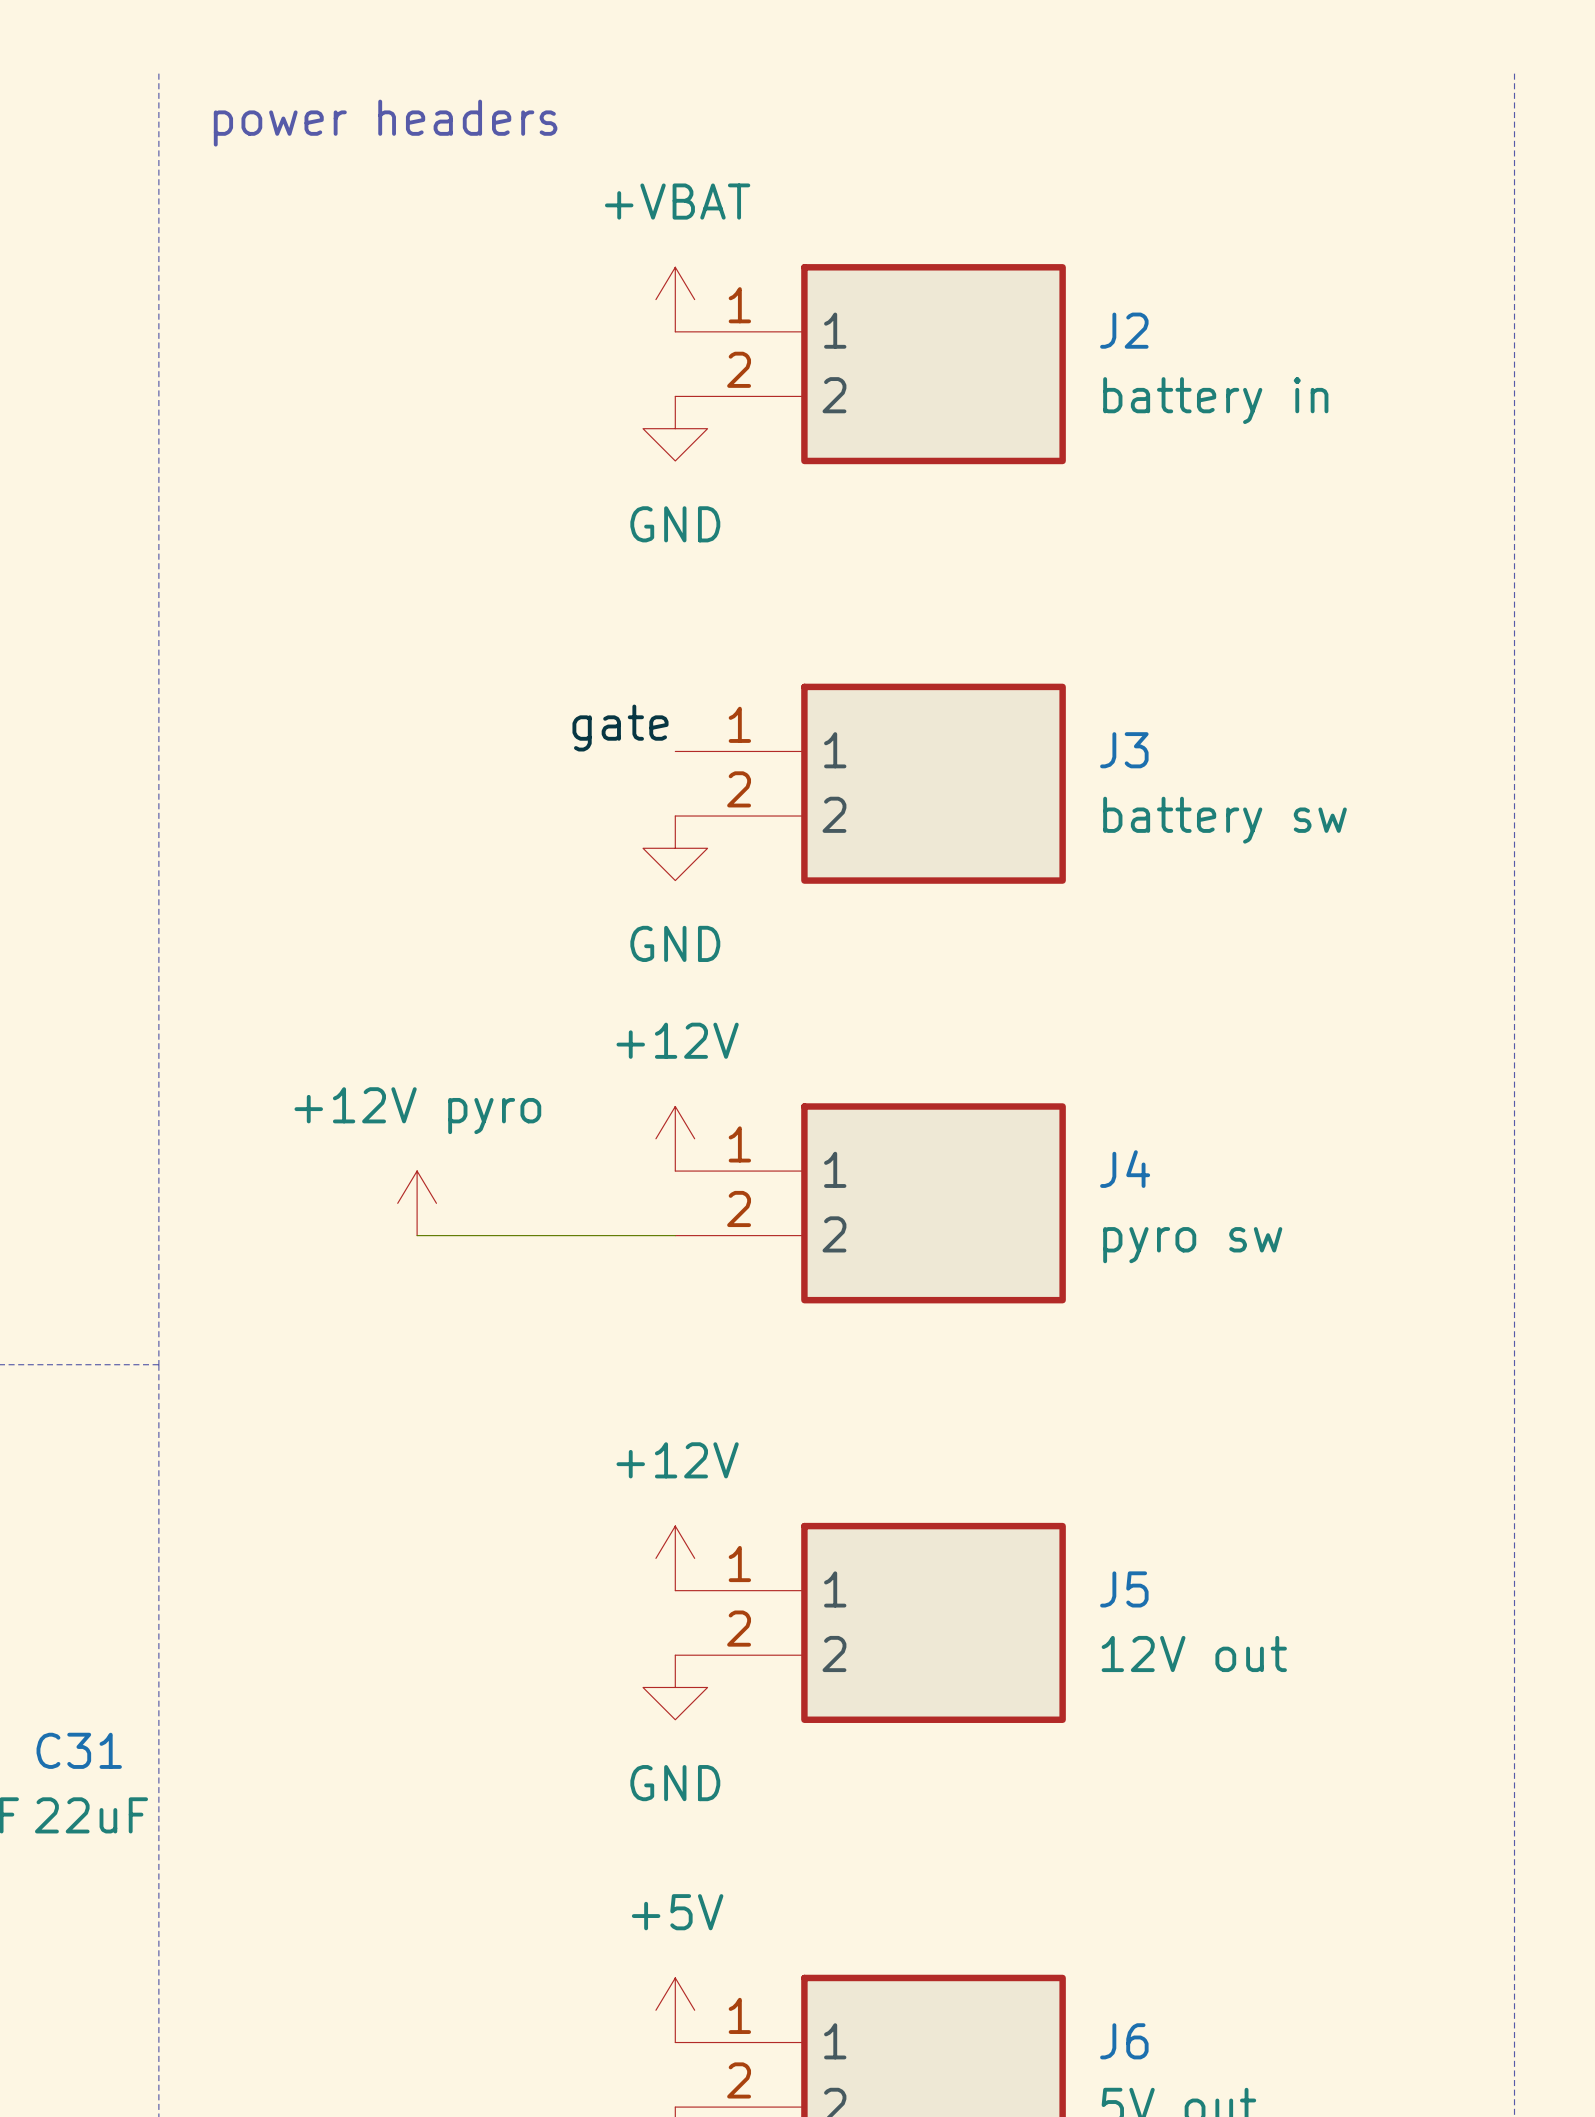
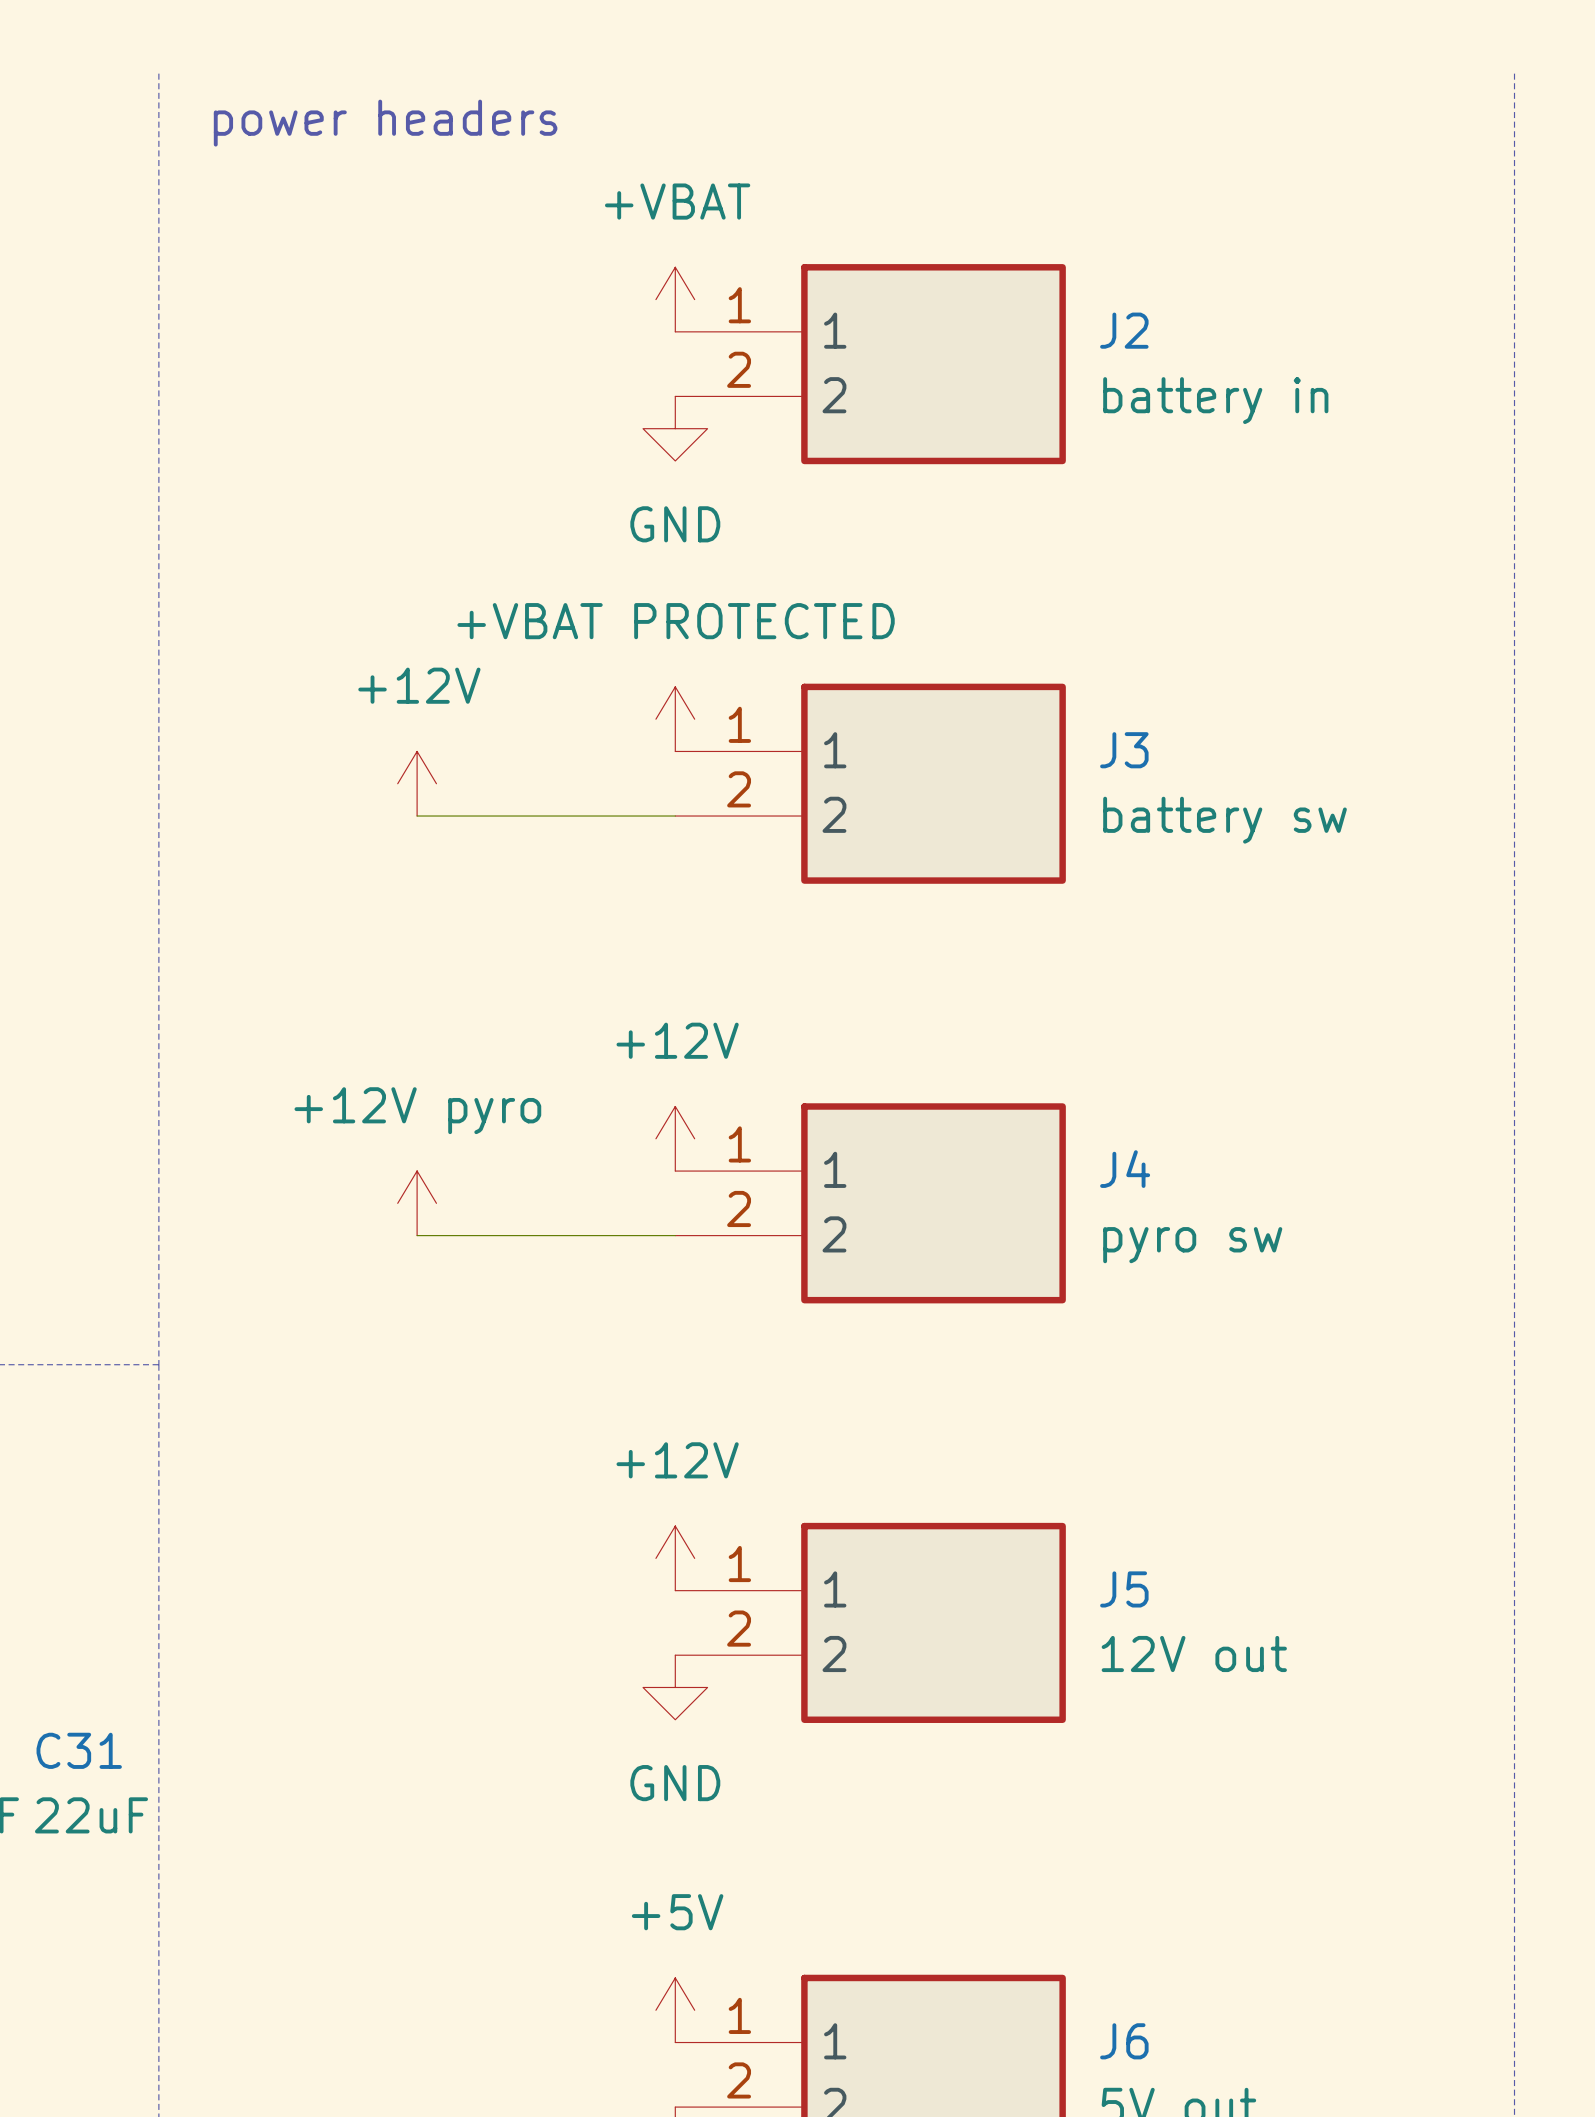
power symbol: none -> +VBAT PROTECTED (675, 719)
label: gate (620, 728) -> none
power symbol: none -> +12V (417, 783)
wire: none -> (417, 816) (675, 816)
power symbol: GND (675, 848) -> none

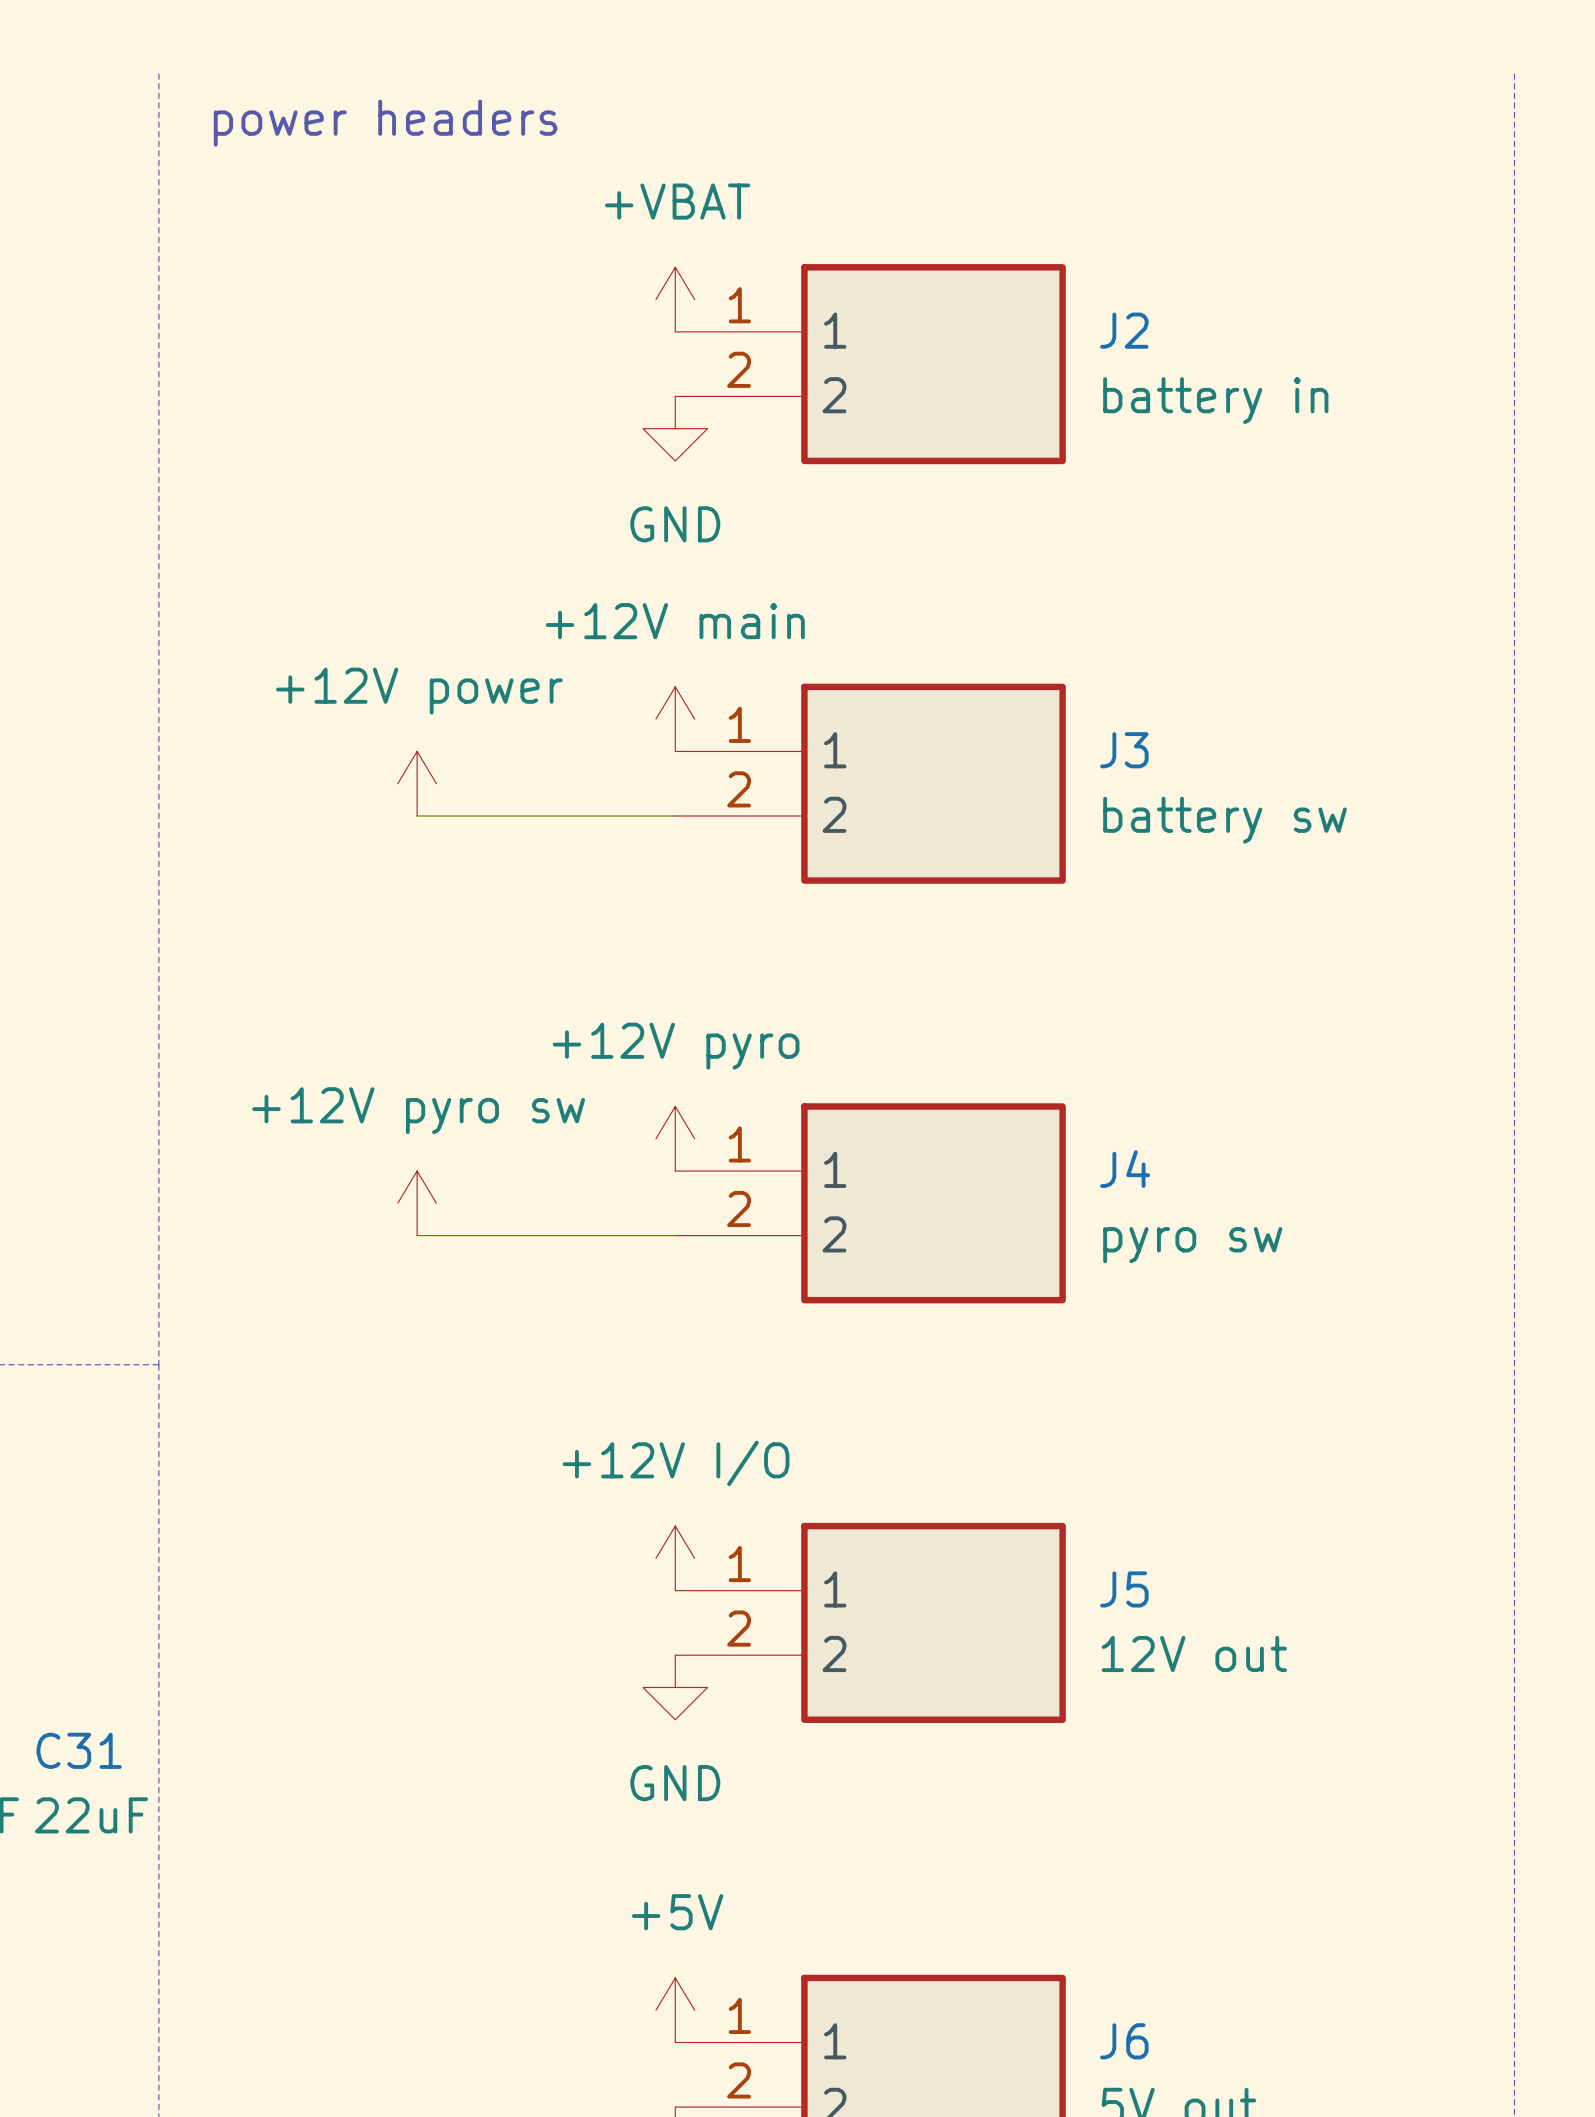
power symbol: +VBAT PROTECTED (675, 719) -> +12V main (675, 719)
power symbol: +12V (417, 783) -> +12V power (417, 783)
power symbol: +12V (675, 1138) -> +12V pyro (675, 1138)
power symbol: +12V pyro (417, 1203) -> +12V pyro sw (417, 1203)
power symbol: +12V (675, 1558) -> +12V I/O (675, 1558)

